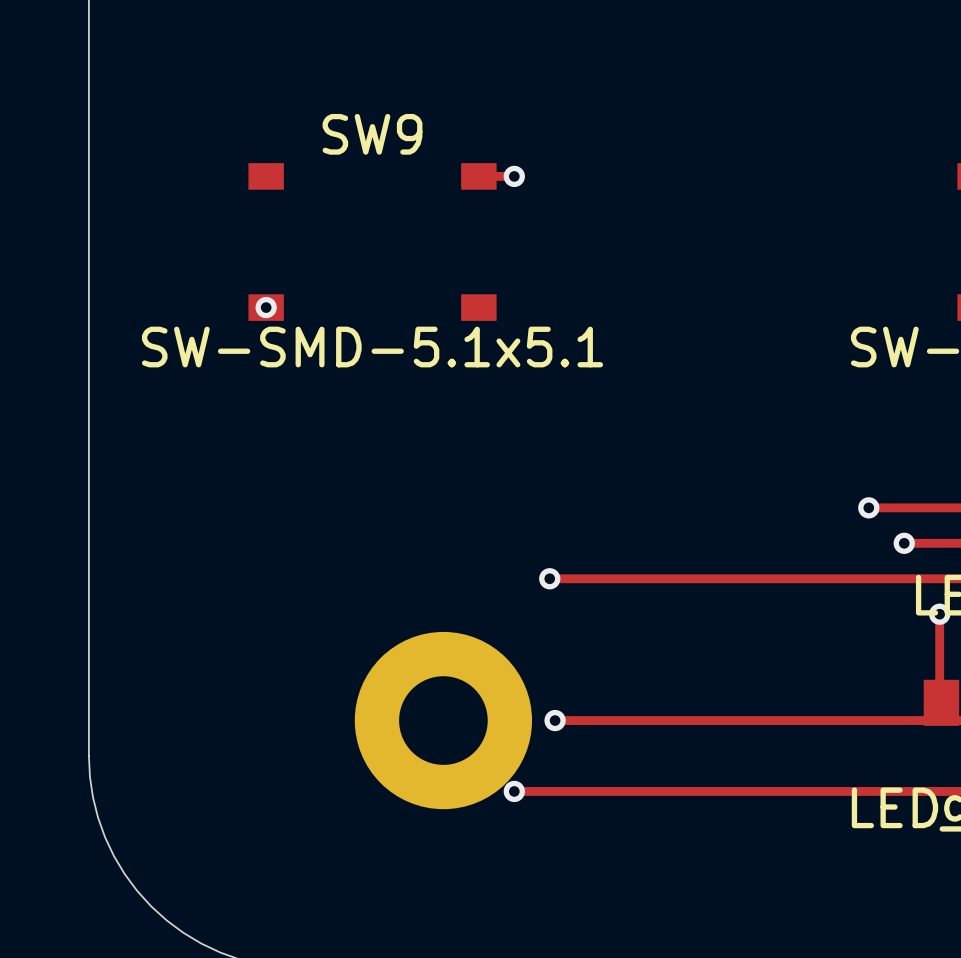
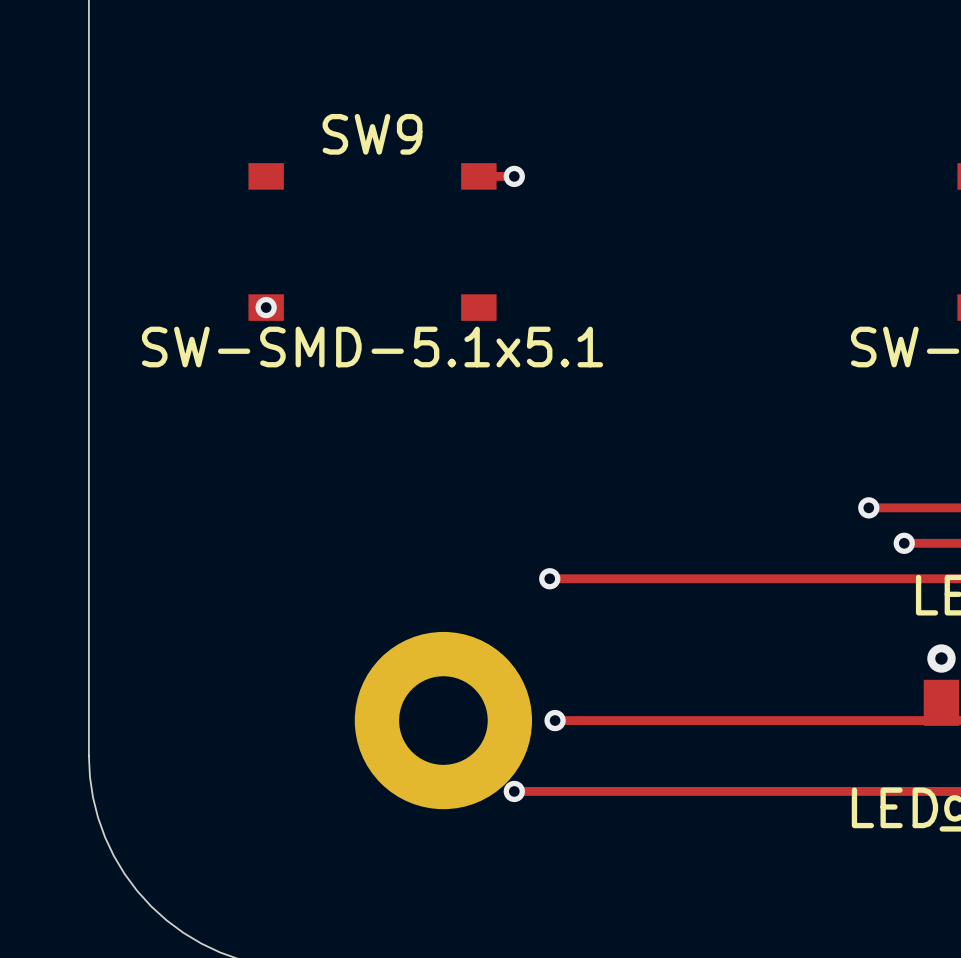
track: (939, 614) (939, 702) -> none
via: (939, 614) -> none
via: none -> (941, 658)

